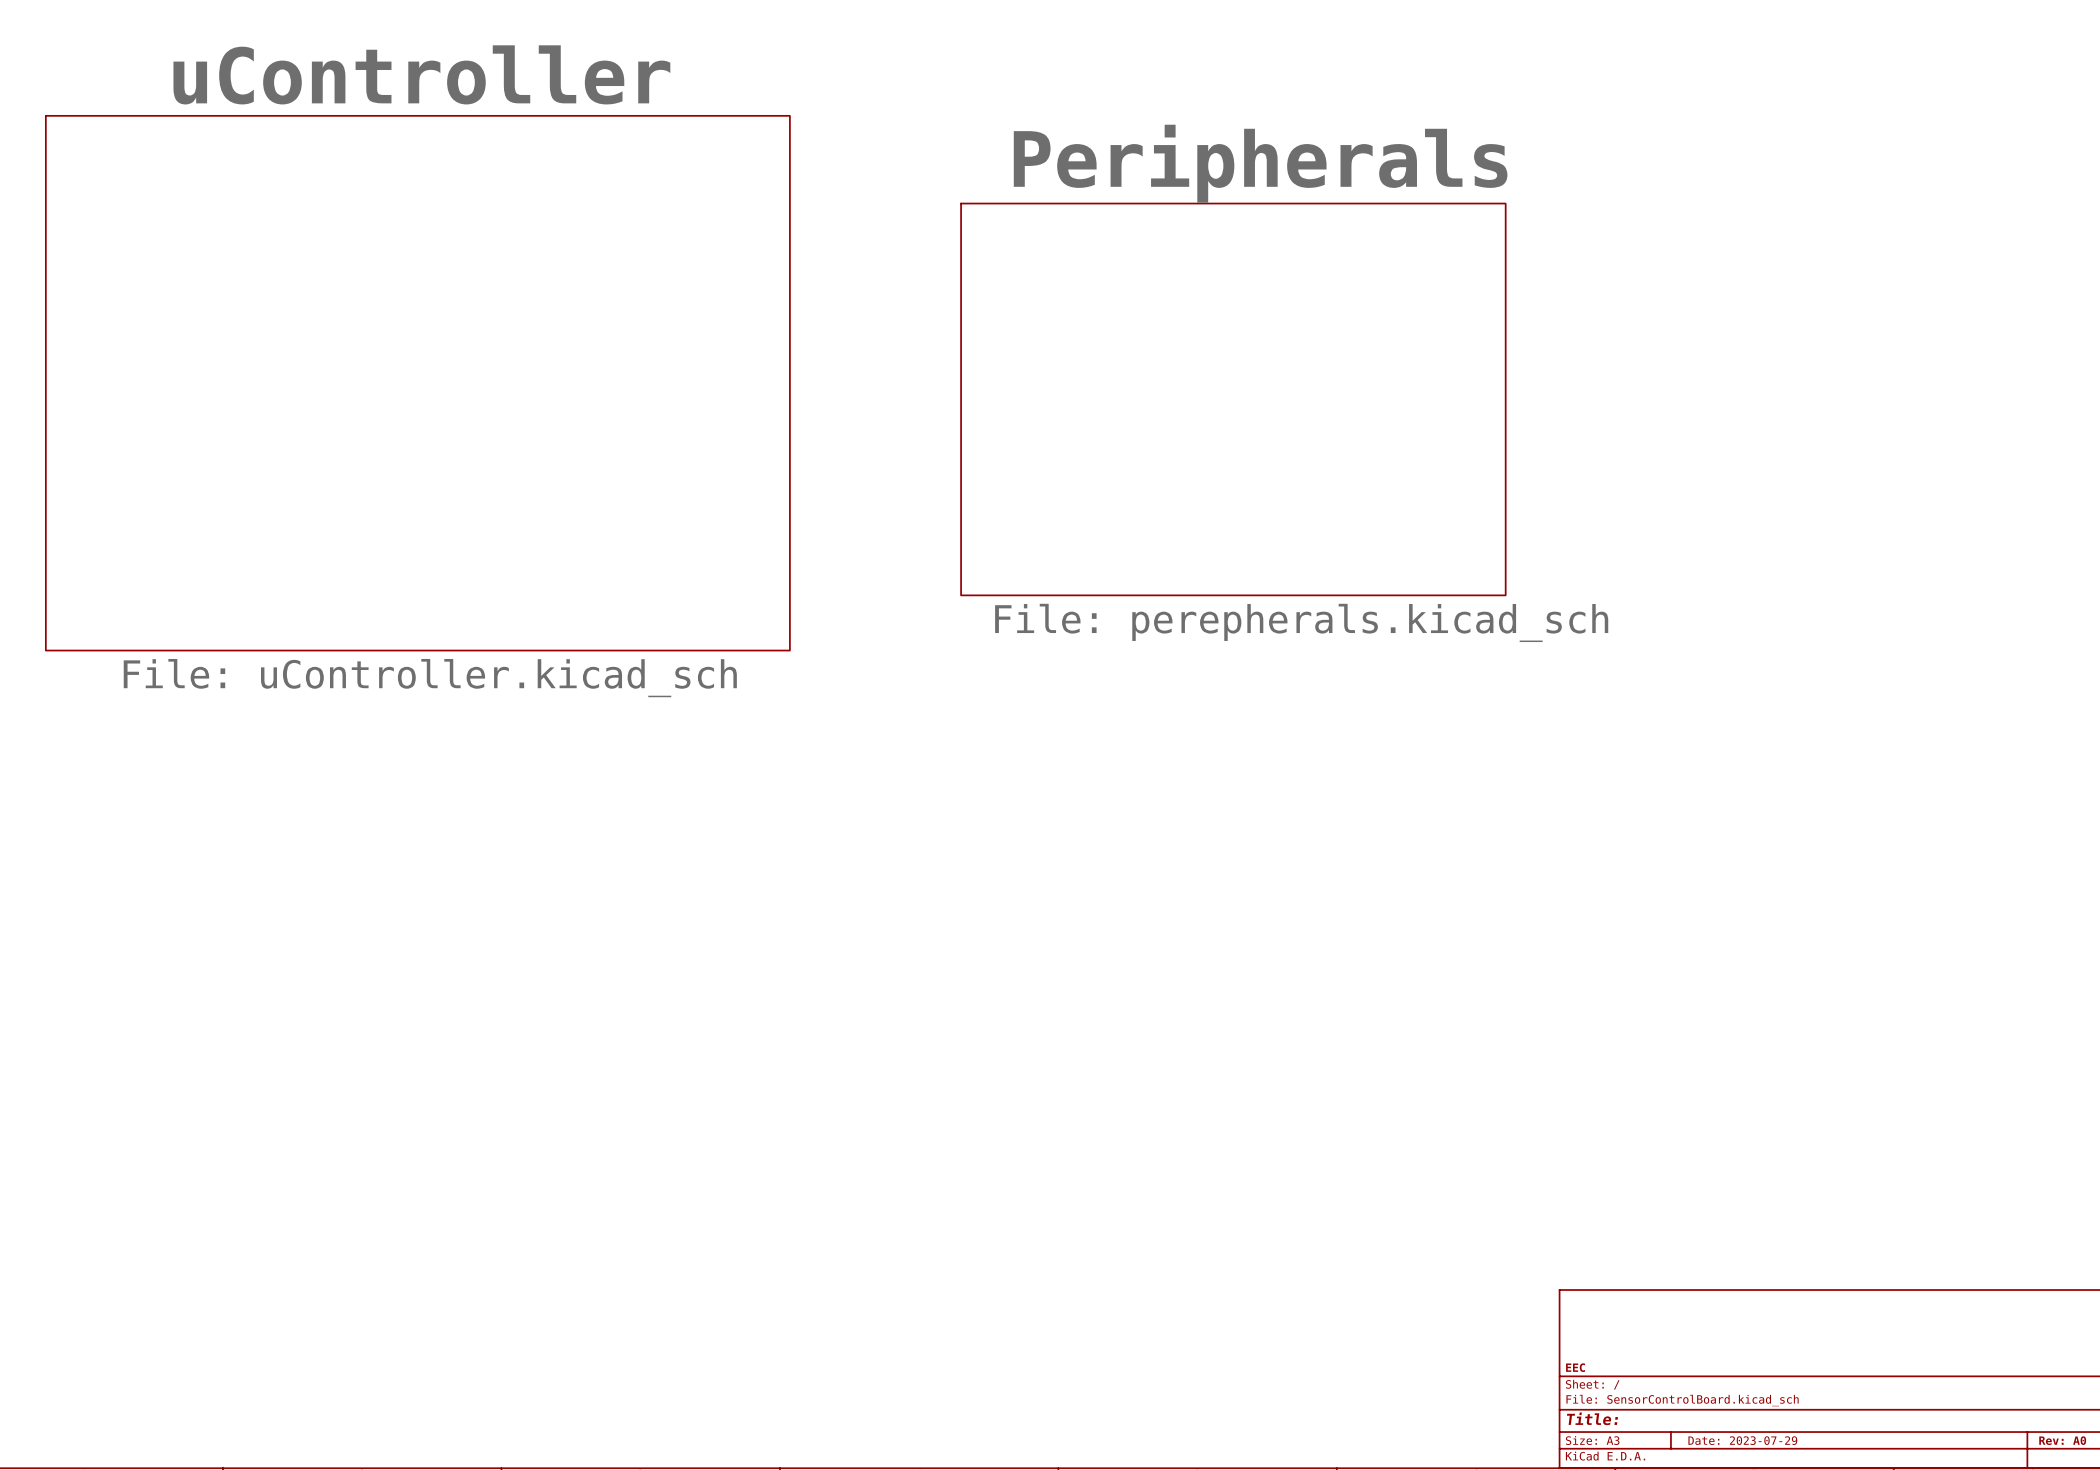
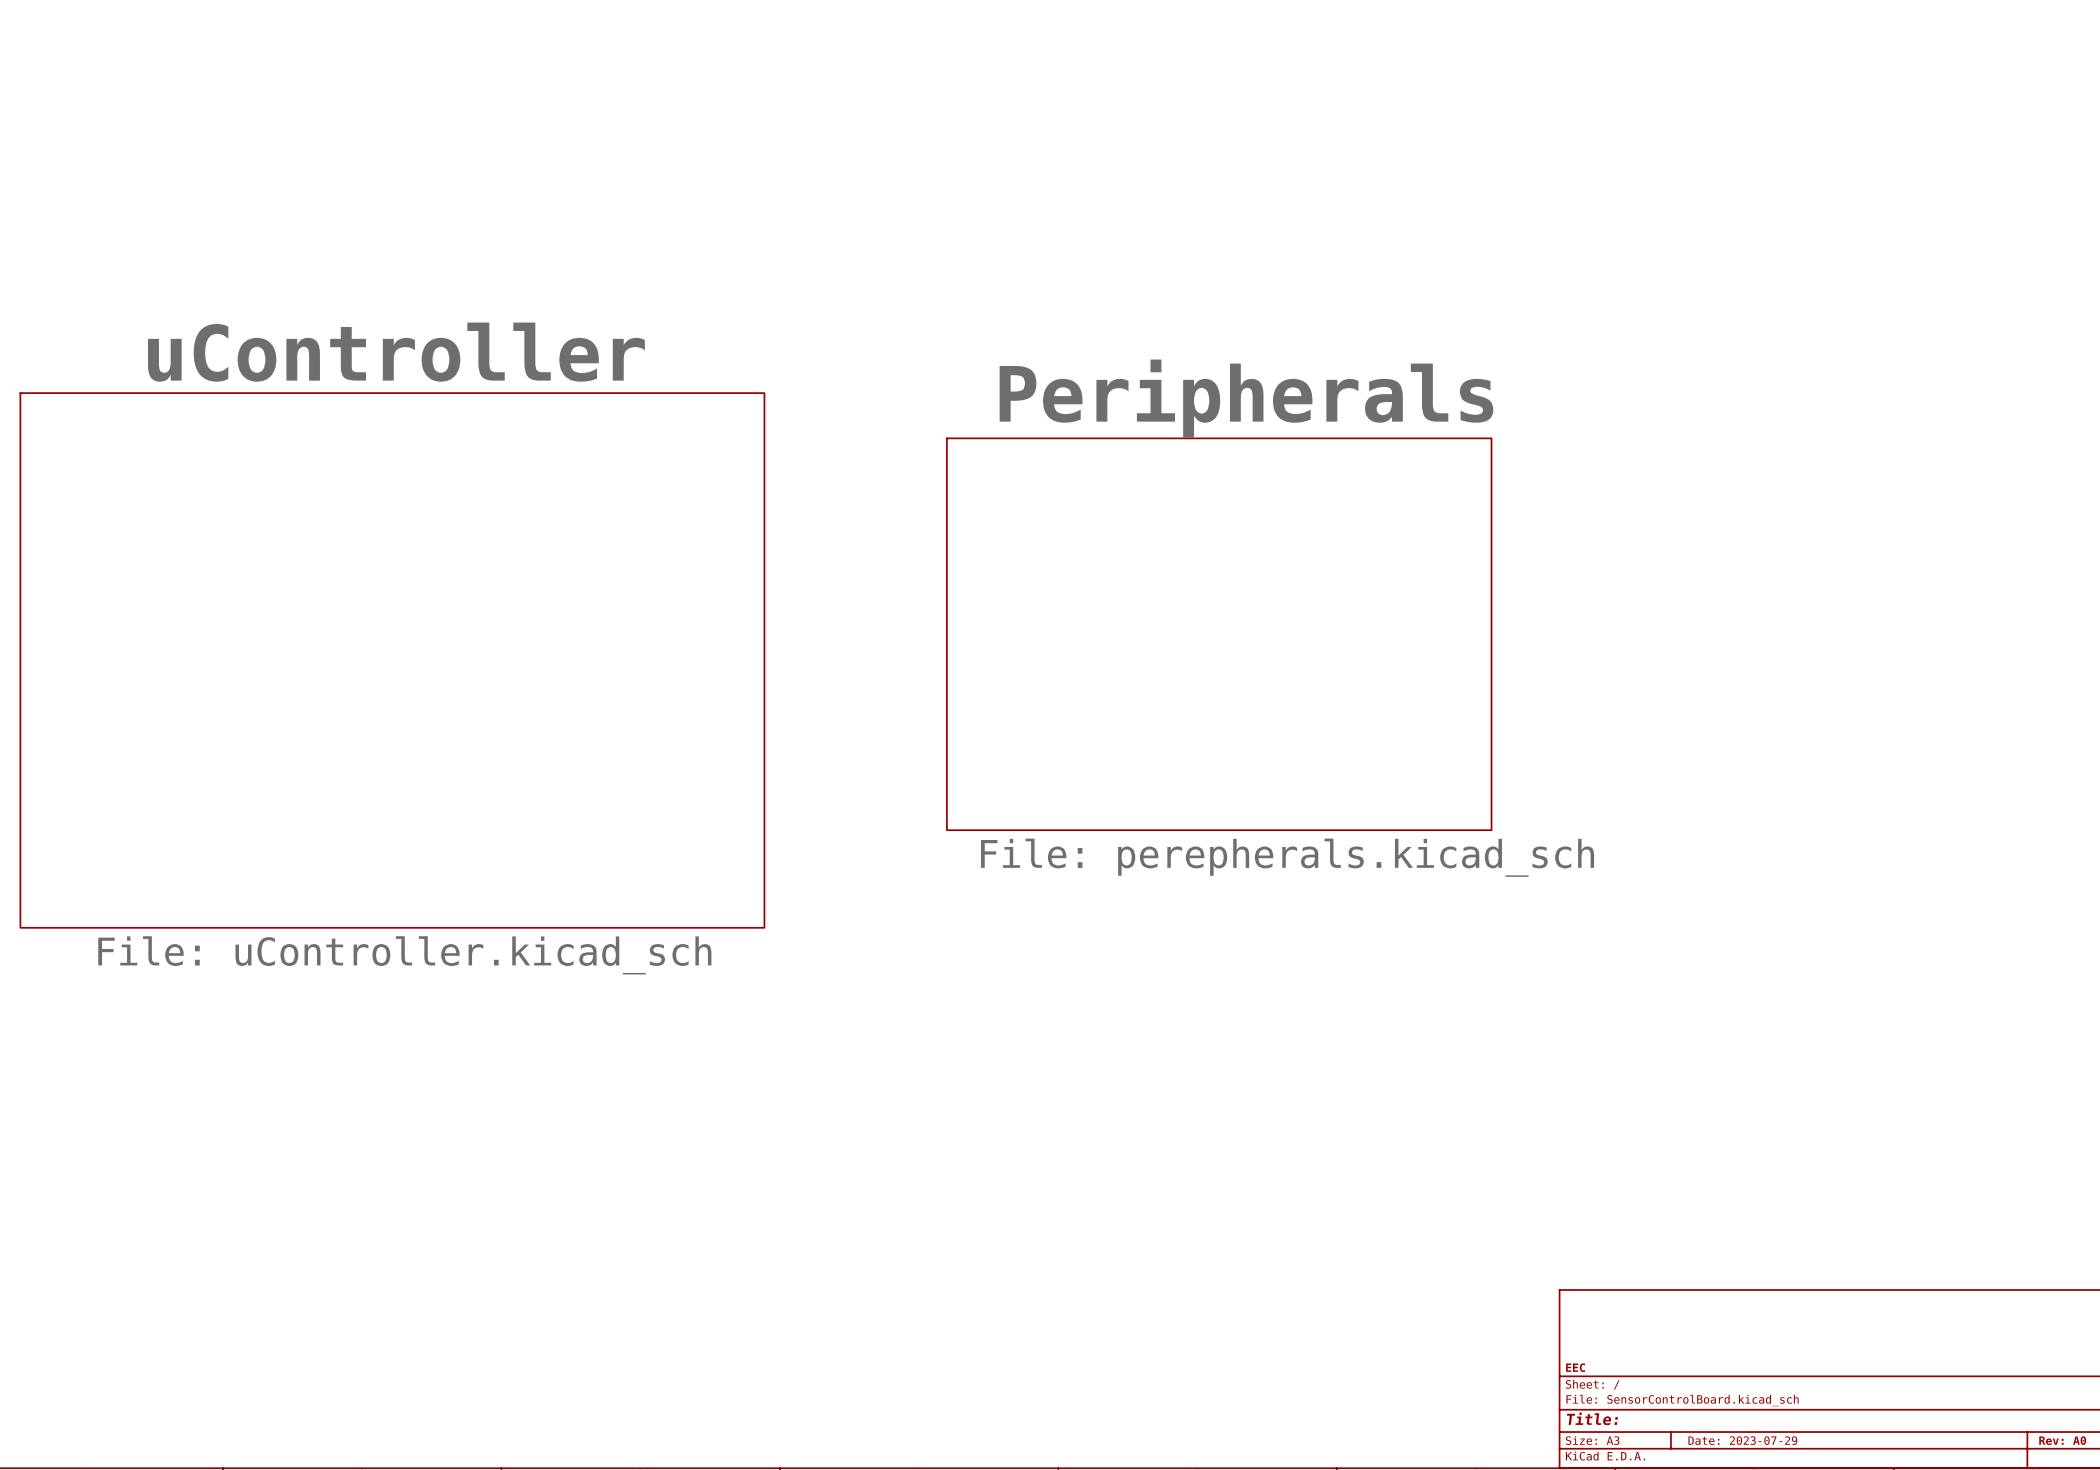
sheet uController: File: uController.kicad_sch (417, 383) -> none
sheet Peripherals: File: perepherals.kicad_sch (1233, 399) -> none
sheet Peripherals: none -> File: perepherals.kicad_sch (1219, 634)
sheet uController: none -> File: uController.kicad_sch (392, 660)

